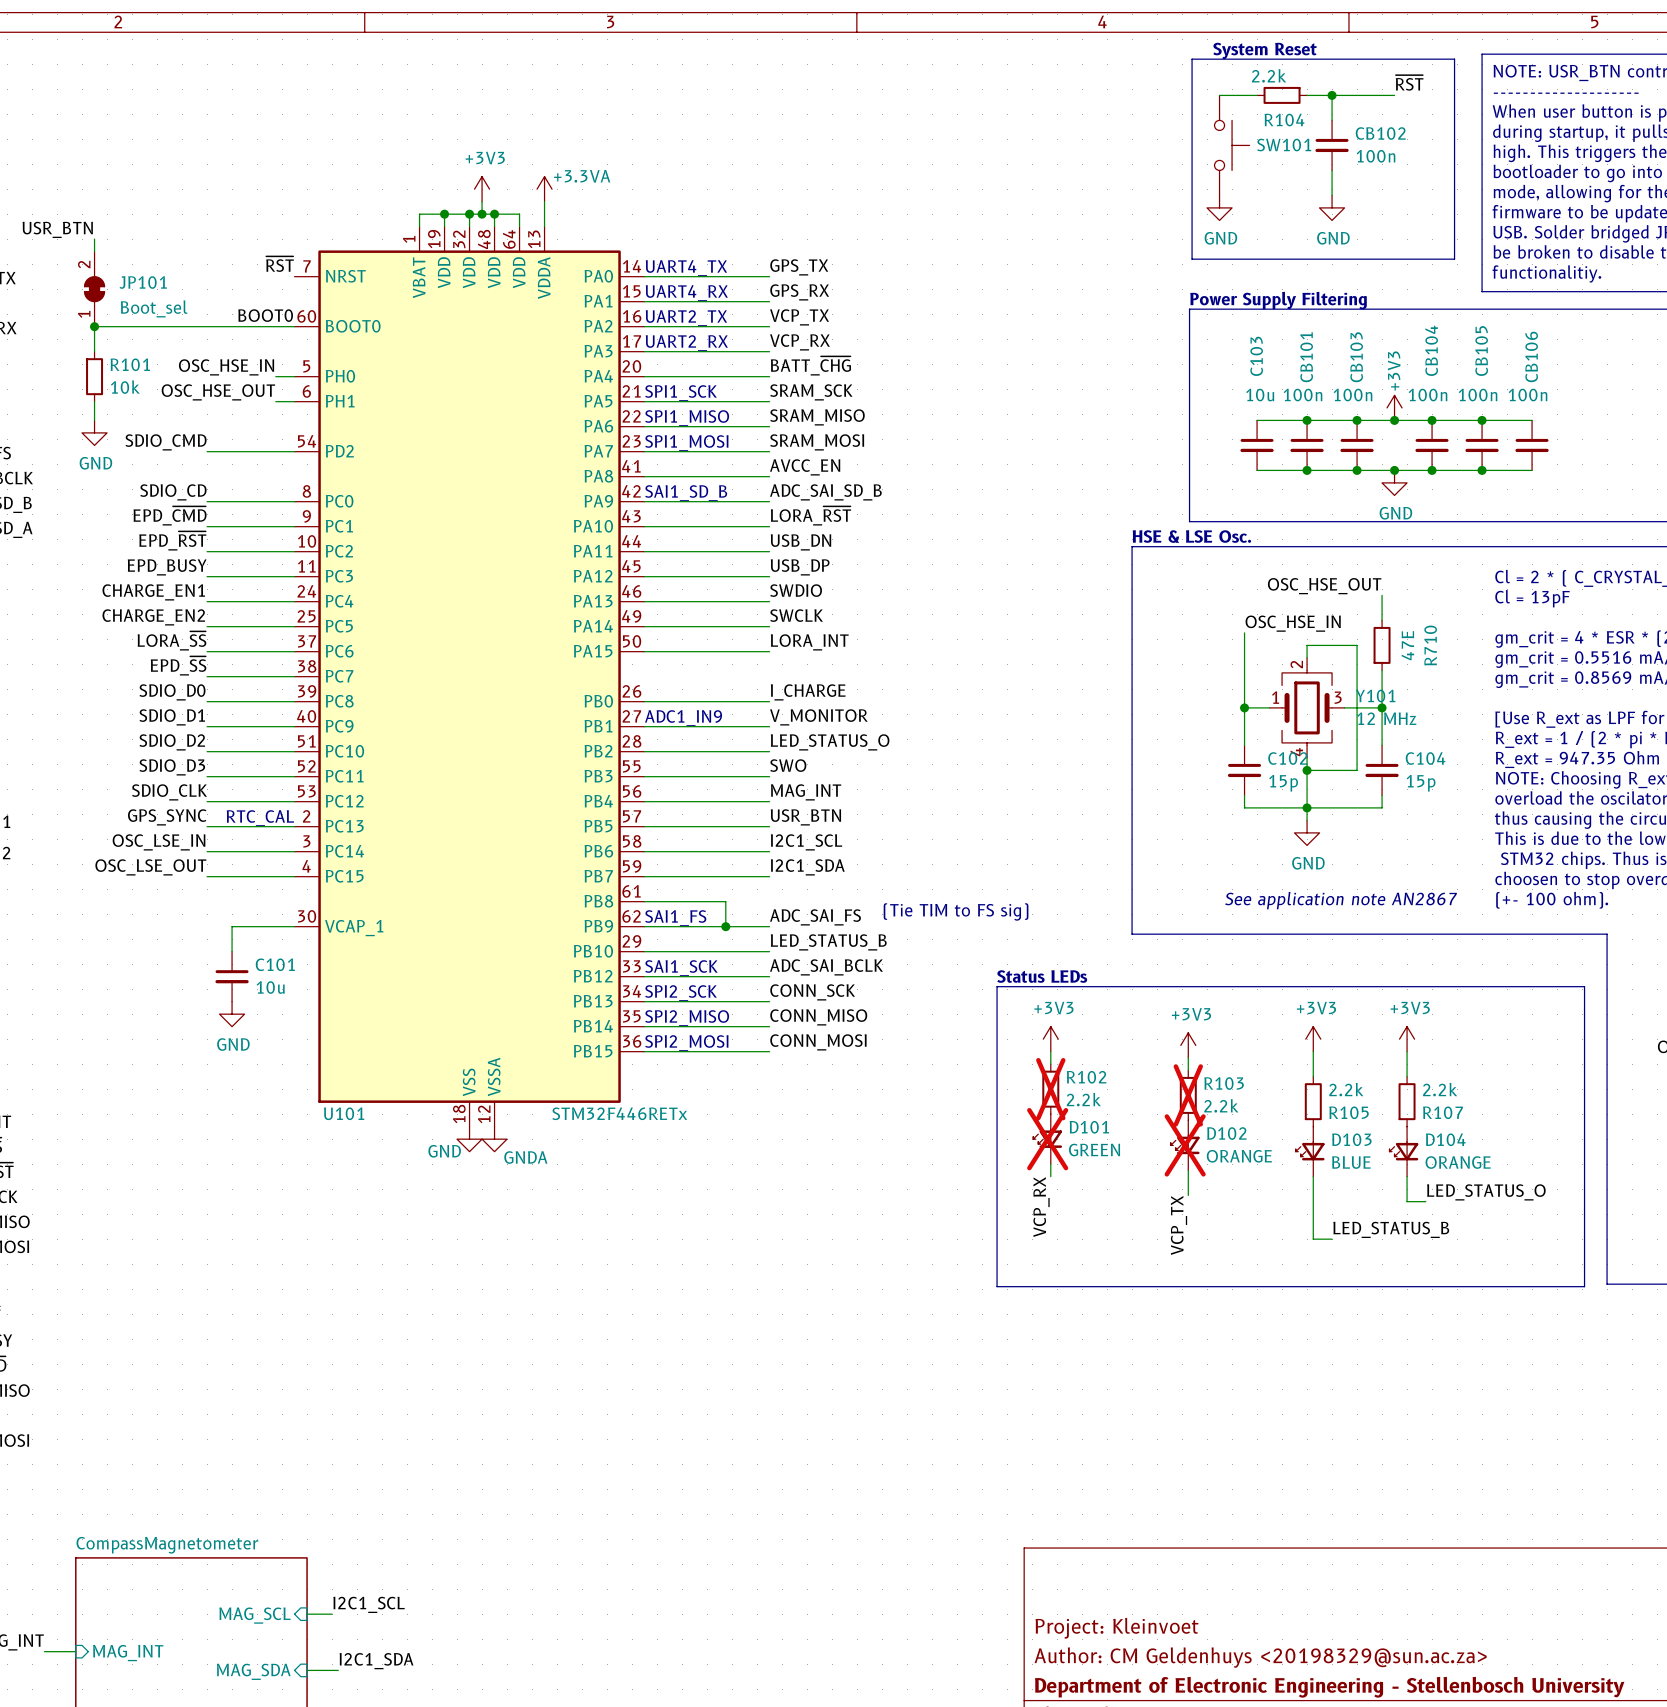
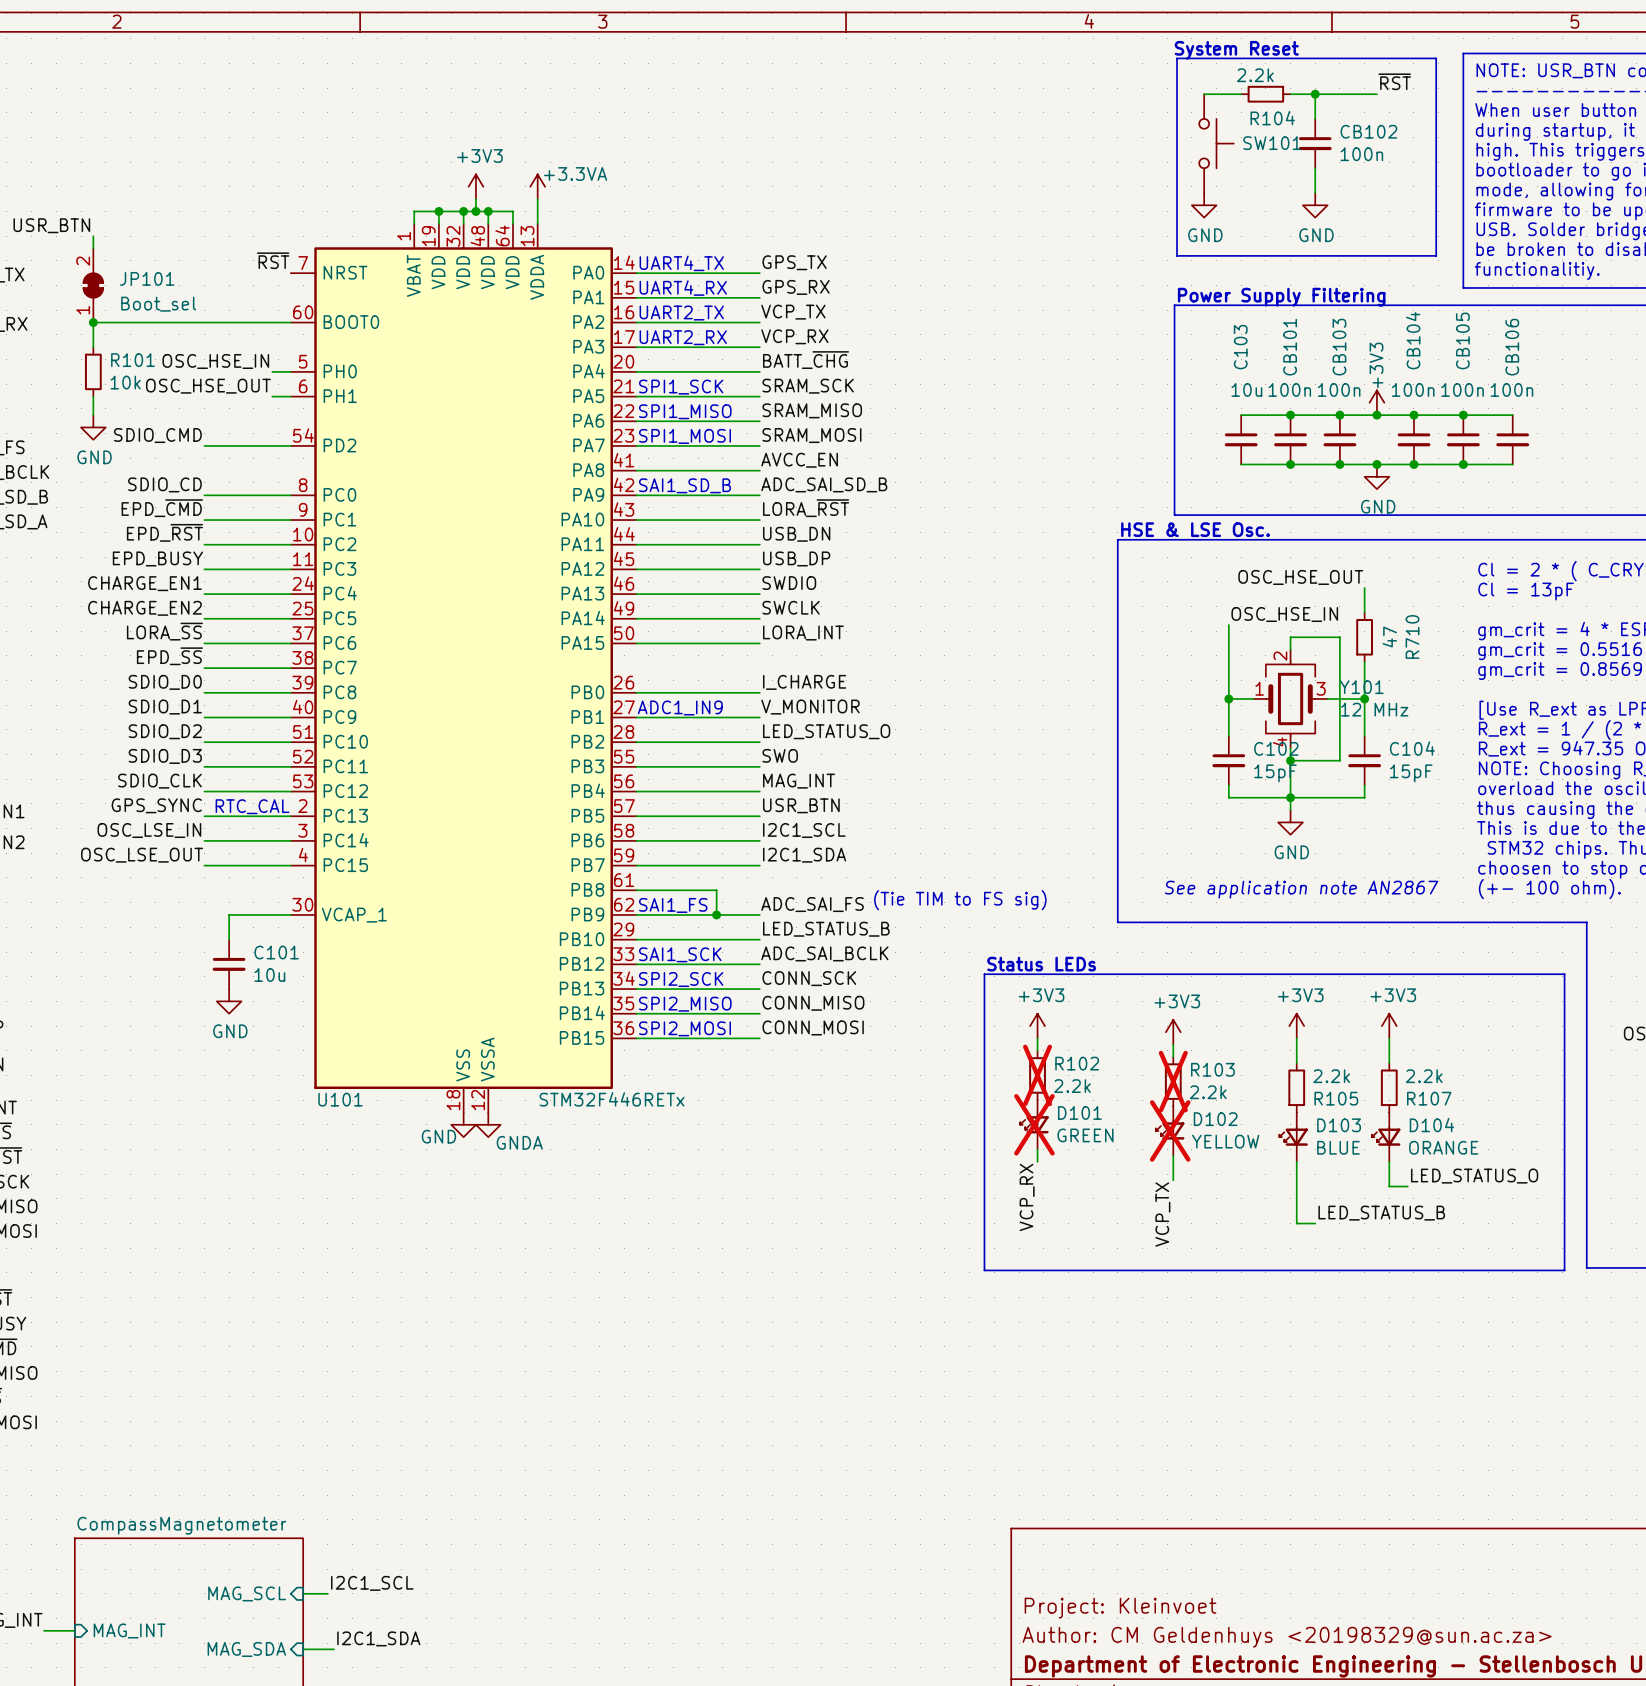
label: BOOT0 (265, 315) -> none
R710 value: 47E (1407, 645) -> 47 (1389, 636)
C102 value: 15p (1283, 783) -> 15pF (1275, 773)
C104 value: 15p (1421, 783) -> 15pF (1411, 773)
D102 value: ORANGE (1239, 1156) -> YELLOW (1225, 1141)

